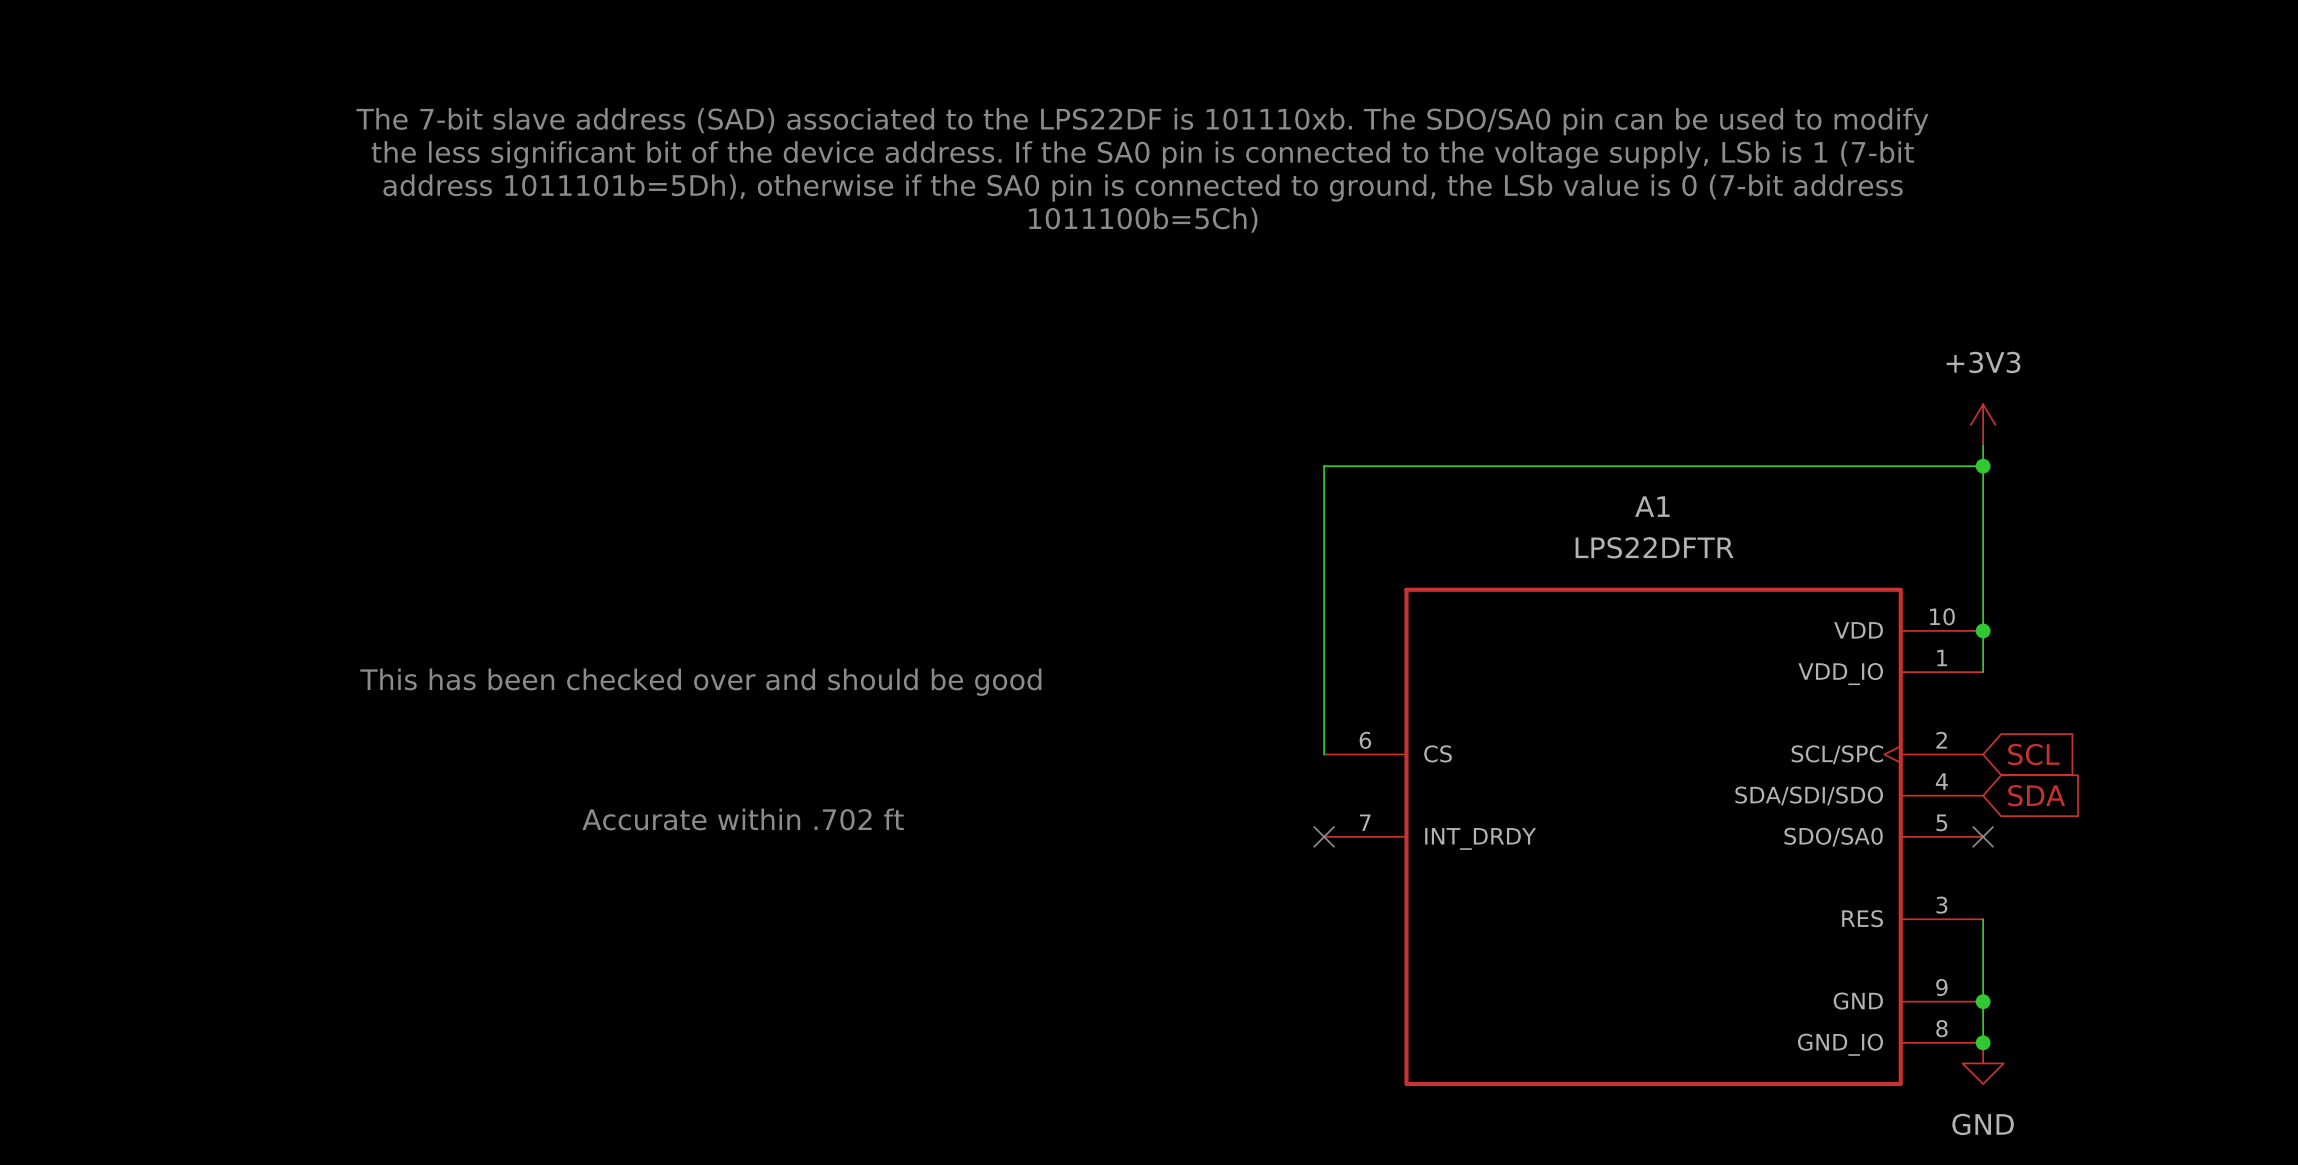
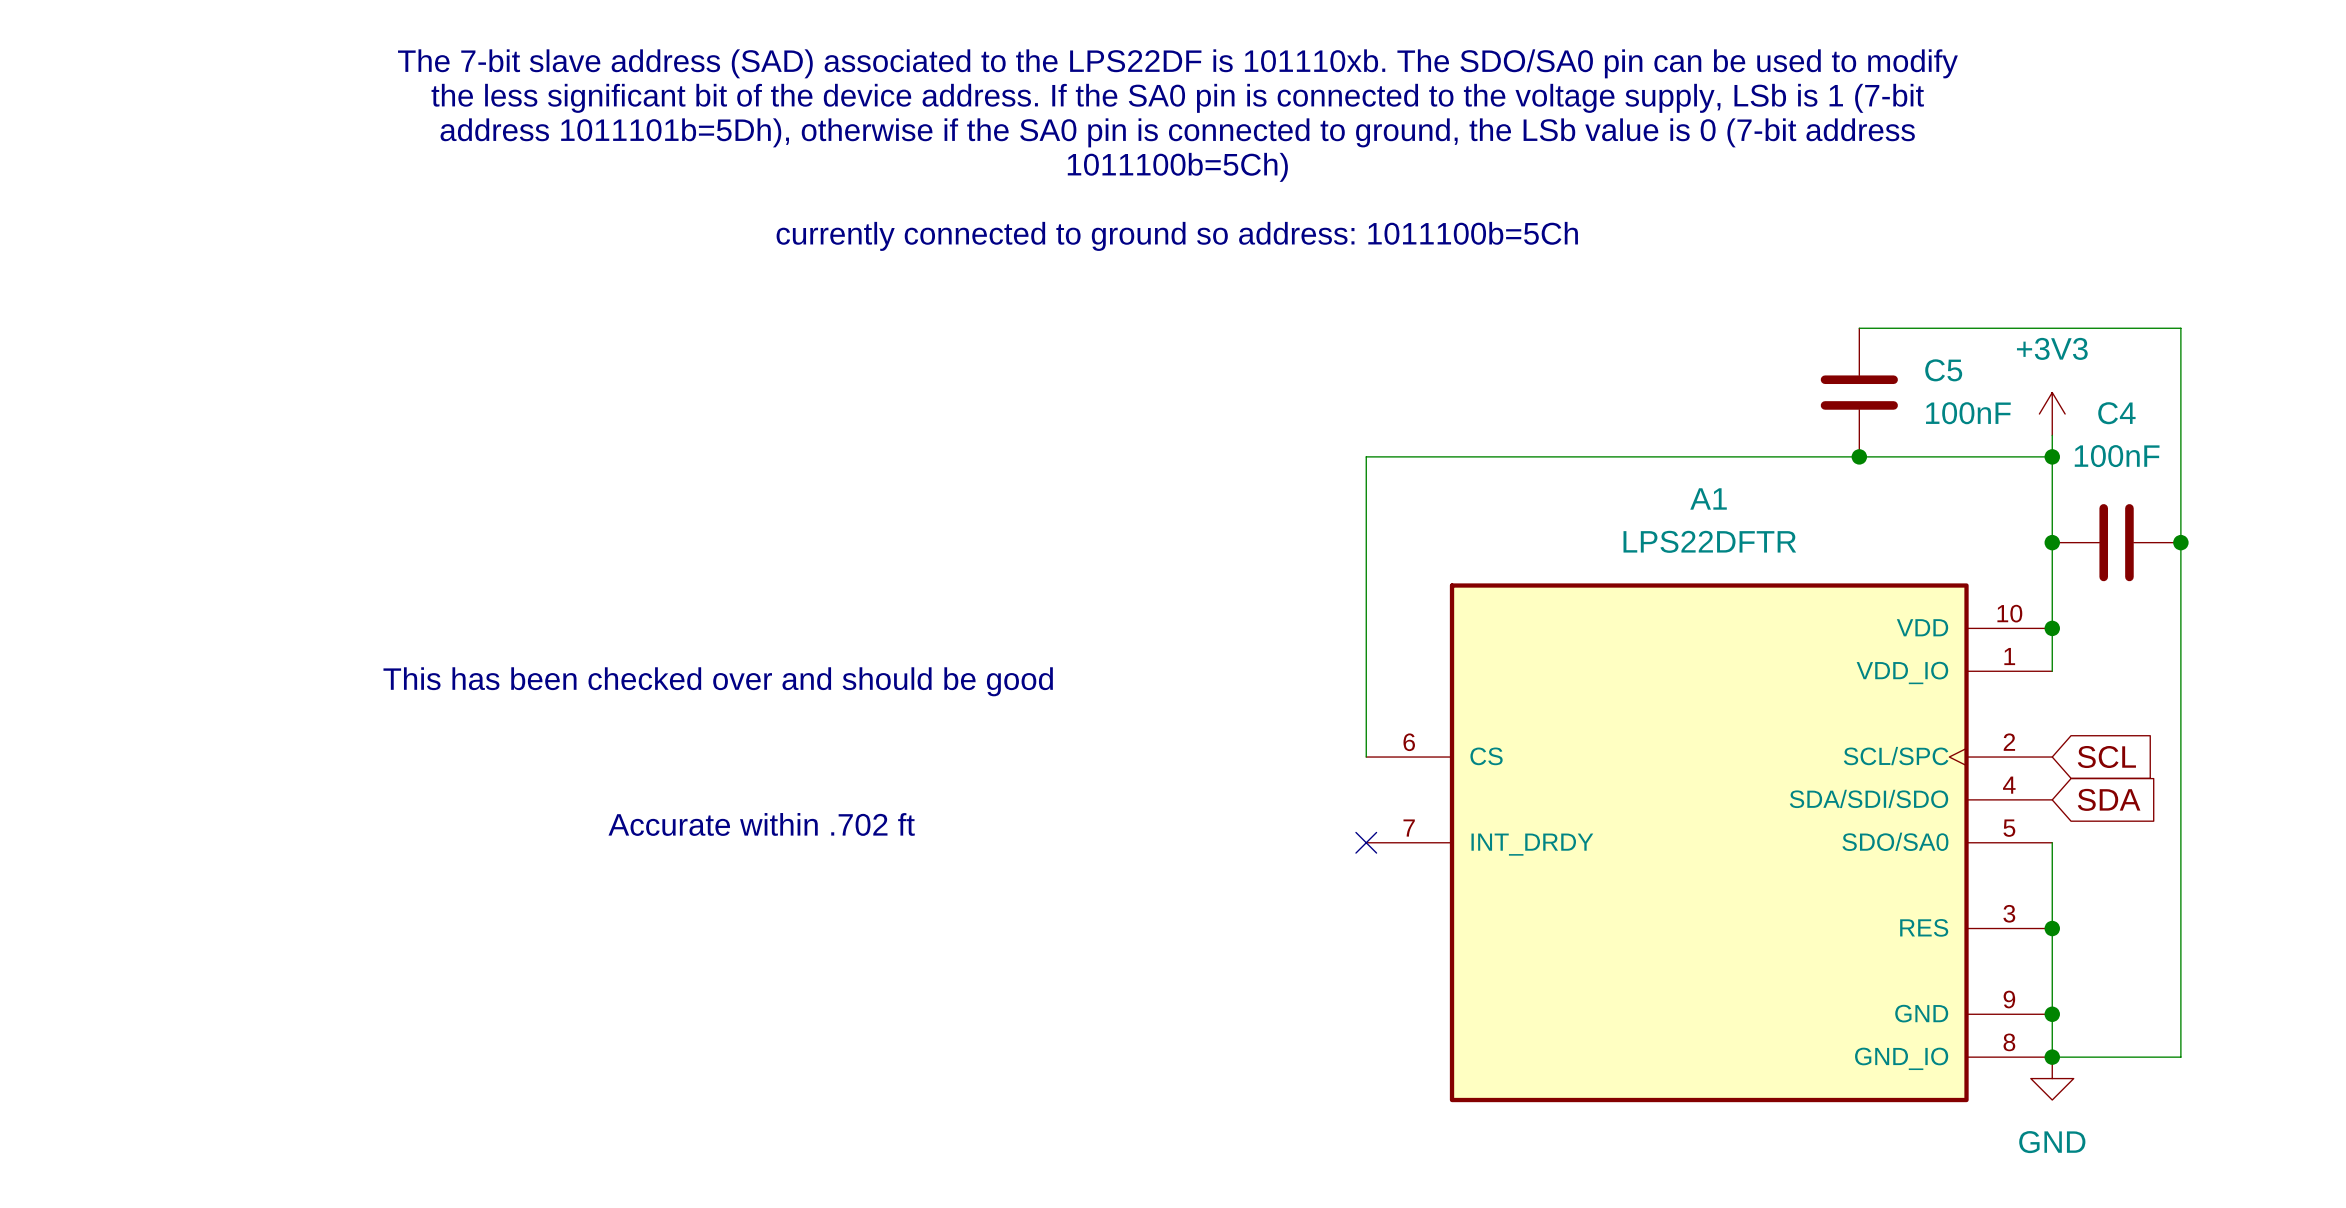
text: none -> The 7-bit slave address (SAD) associated to the LPS22DF is 101110xb. The SDO/SA0 pin can be used to modify (1177, 63)
text: The 7-bit slave address (SAD) associated to the LPS22DF is 101110xb. The SDO/SA0 pin can be used to modify (1142, 121) -> the less significant bit of the device address. If the SA0 pin is connected to the voltage supply, LSb is 1 (7-bit (1177, 98)
text: the less significant bit of the device address. If the SA0 pin is connected to the voltage supply, LSb is 1 (7-bit (1142, 154) -> address 1011101b=5Dh), otherwise if the SA0 pin is connected to ground, the LSb value is 0 (7-bit address (1177, 132)
text: address 1011101b=5Dh), otherwise if the SA0 pin is connected to ground, the LSb value is 0 (7-bit address (1143, 188) -> 1011100b=5Ch) (1177, 167)
text: 1011100b=5Ch) (1143, 220) -> none
text: none -> currently connected to ground so address: 1011100b=5Ch (1177, 236)
wire: none -> (1859, 328) (2180, 328) (2180, 1057) (2052, 1057)
C5: none -> 100nF (1859, 392)
junction: none -> (1859, 456)
junction: none -> (2052, 542)
C4: none -> 100nF (2116, 542)
junction: none -> (2180, 542)
wire: none -> (2052, 842) (2052, 928)
no-connect mark: (1983, 836) -> none
junction: none -> (2052, 928)

